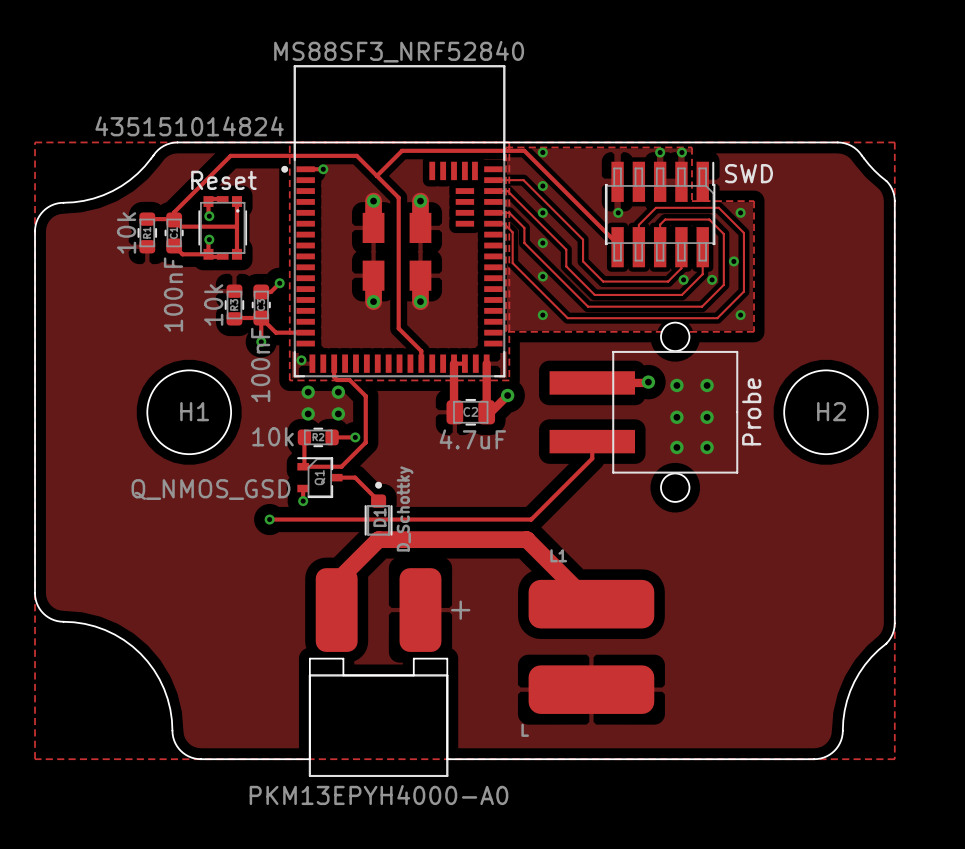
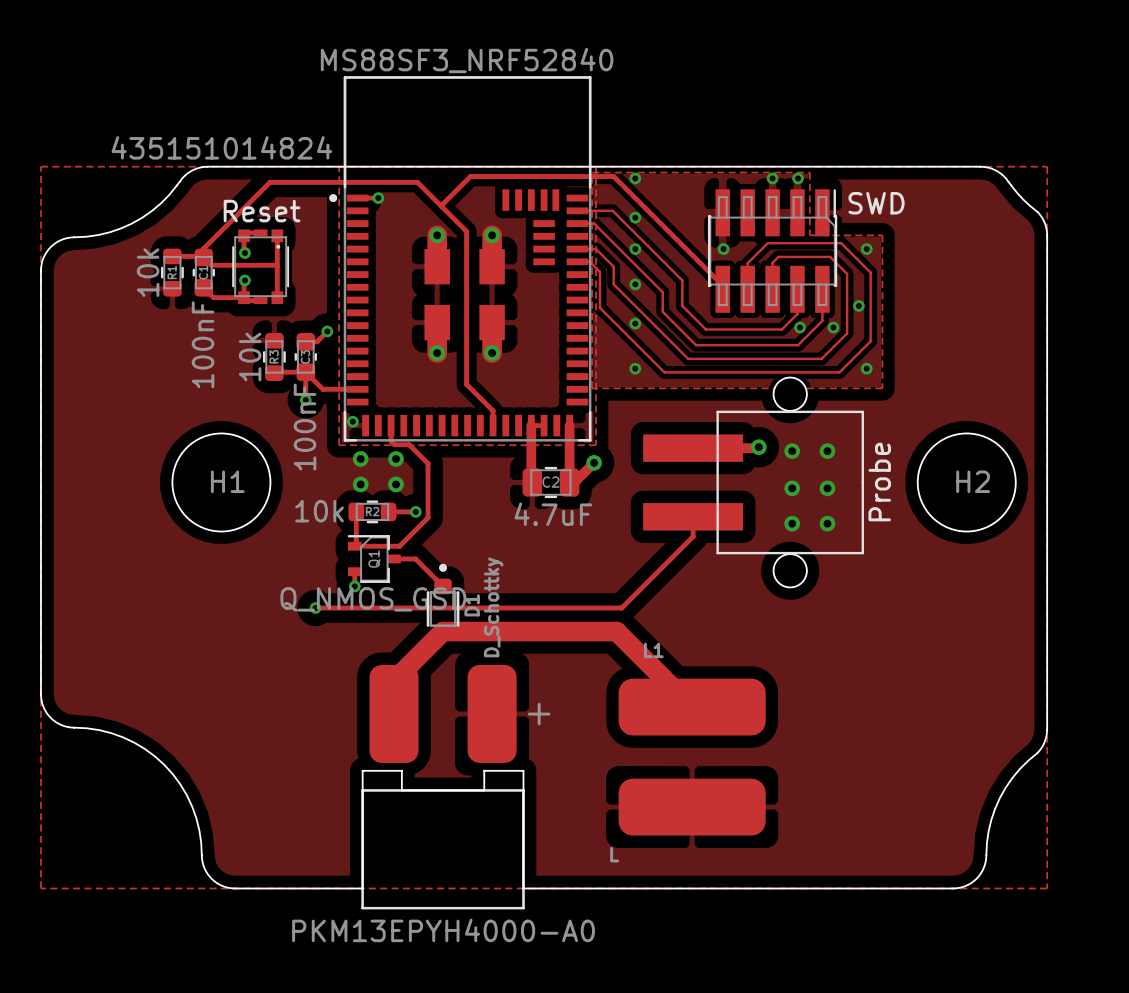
Q1 value position: Q_NMOS_GSD (210, 489) -> Q_NMOS_GSD (373, 599)
D1 value position: D_Schottky (405, 508) -> D_Schottky (493, 607)
D1 name position: D1 (379, 517) -> D1 (472, 605)

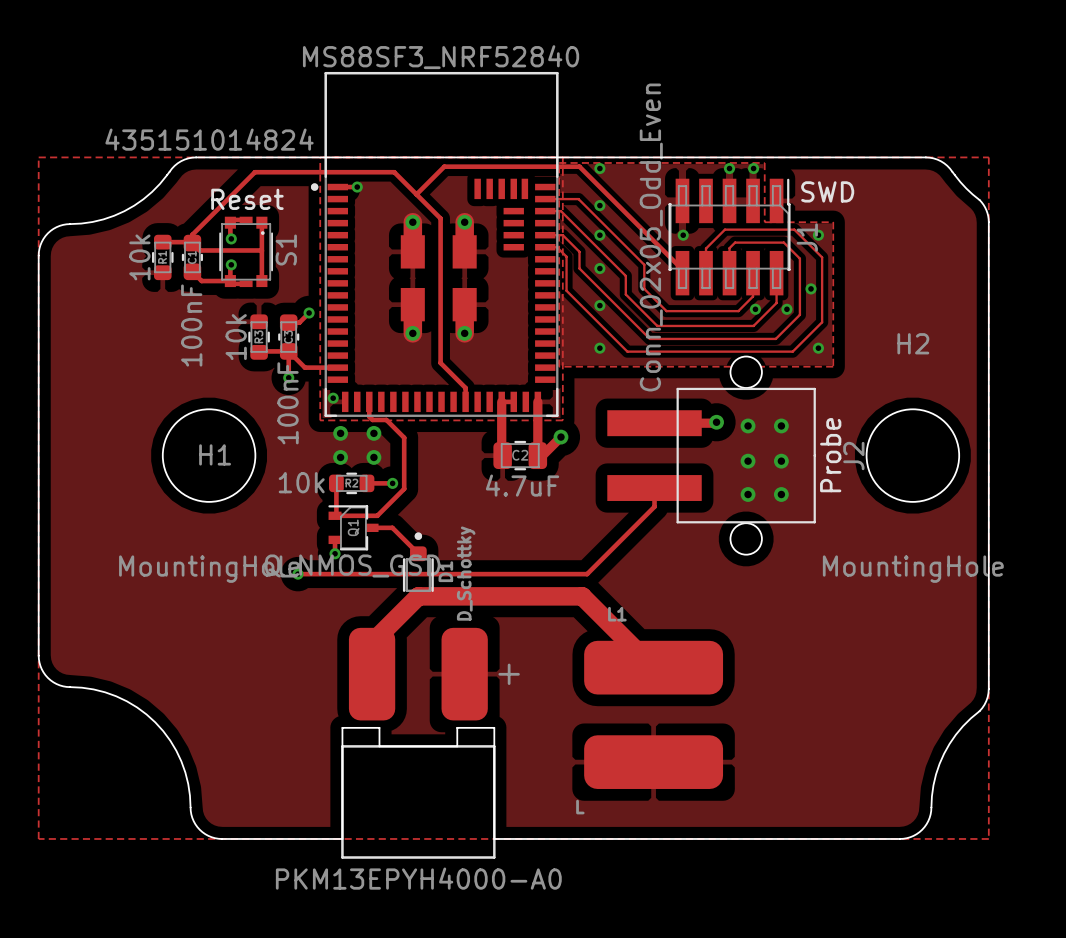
J1 value: none -> Conn_02x05_Odd_Even (651, 237)
J1 name: none -> J1 (807, 237)
S1 name: none -> S1 (286, 250)
H2 name position: H2 (973, 481) -> H2 (913, 343)
J2 name: none -> J2 (853, 456)
H1 value: none -> MountingHole (209, 569)
H2 value: none -> MountingHole (913, 569)

